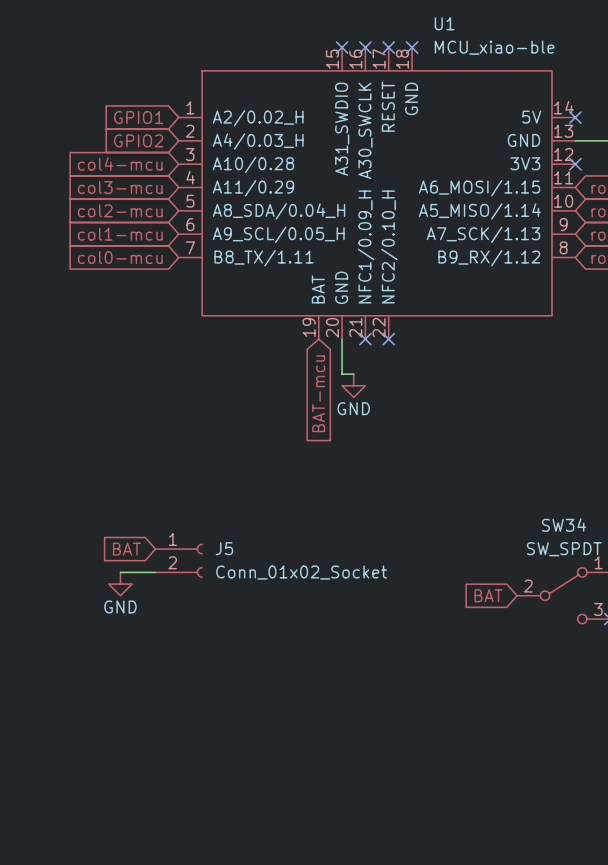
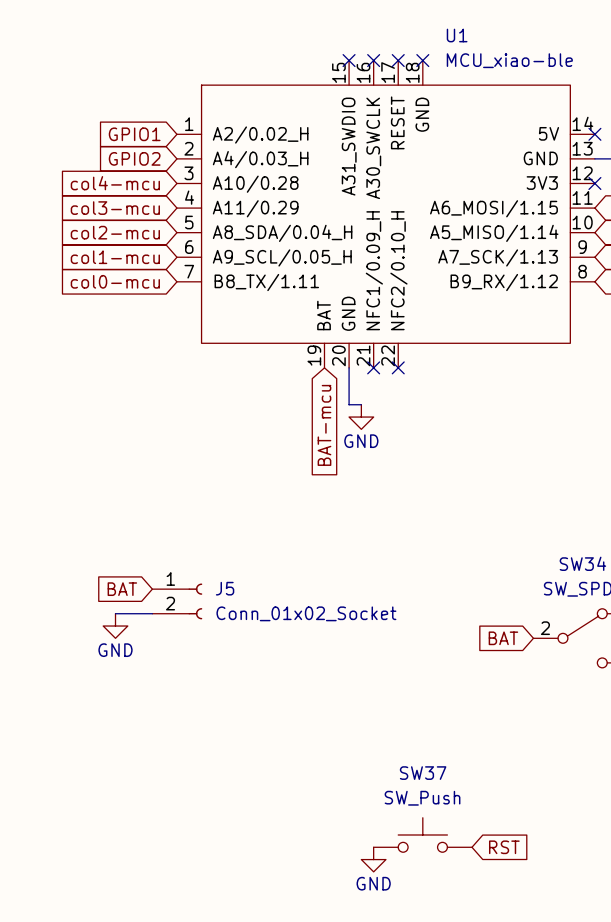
SW37: none -> SW_Push (422, 834)
global label: none -> RST (504, 847)
power symbol: none -> GND (373, 859)

